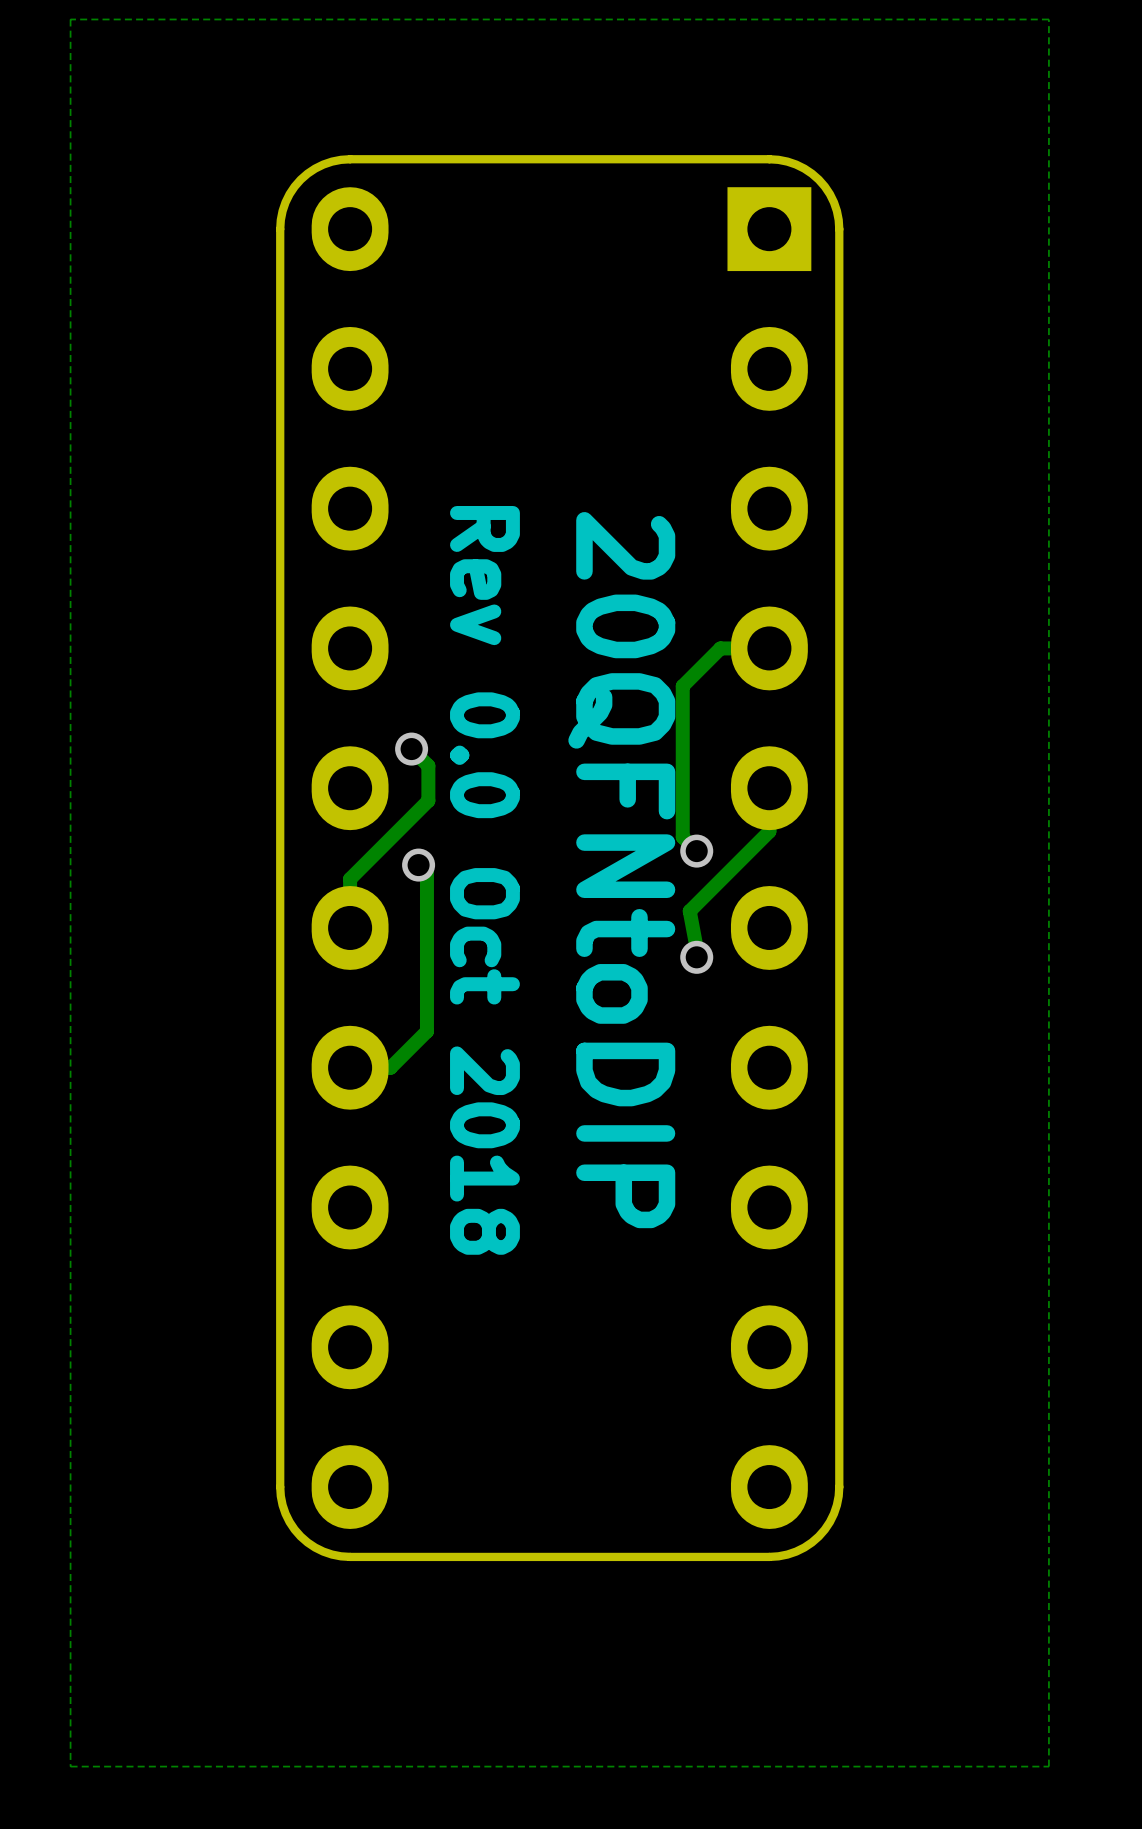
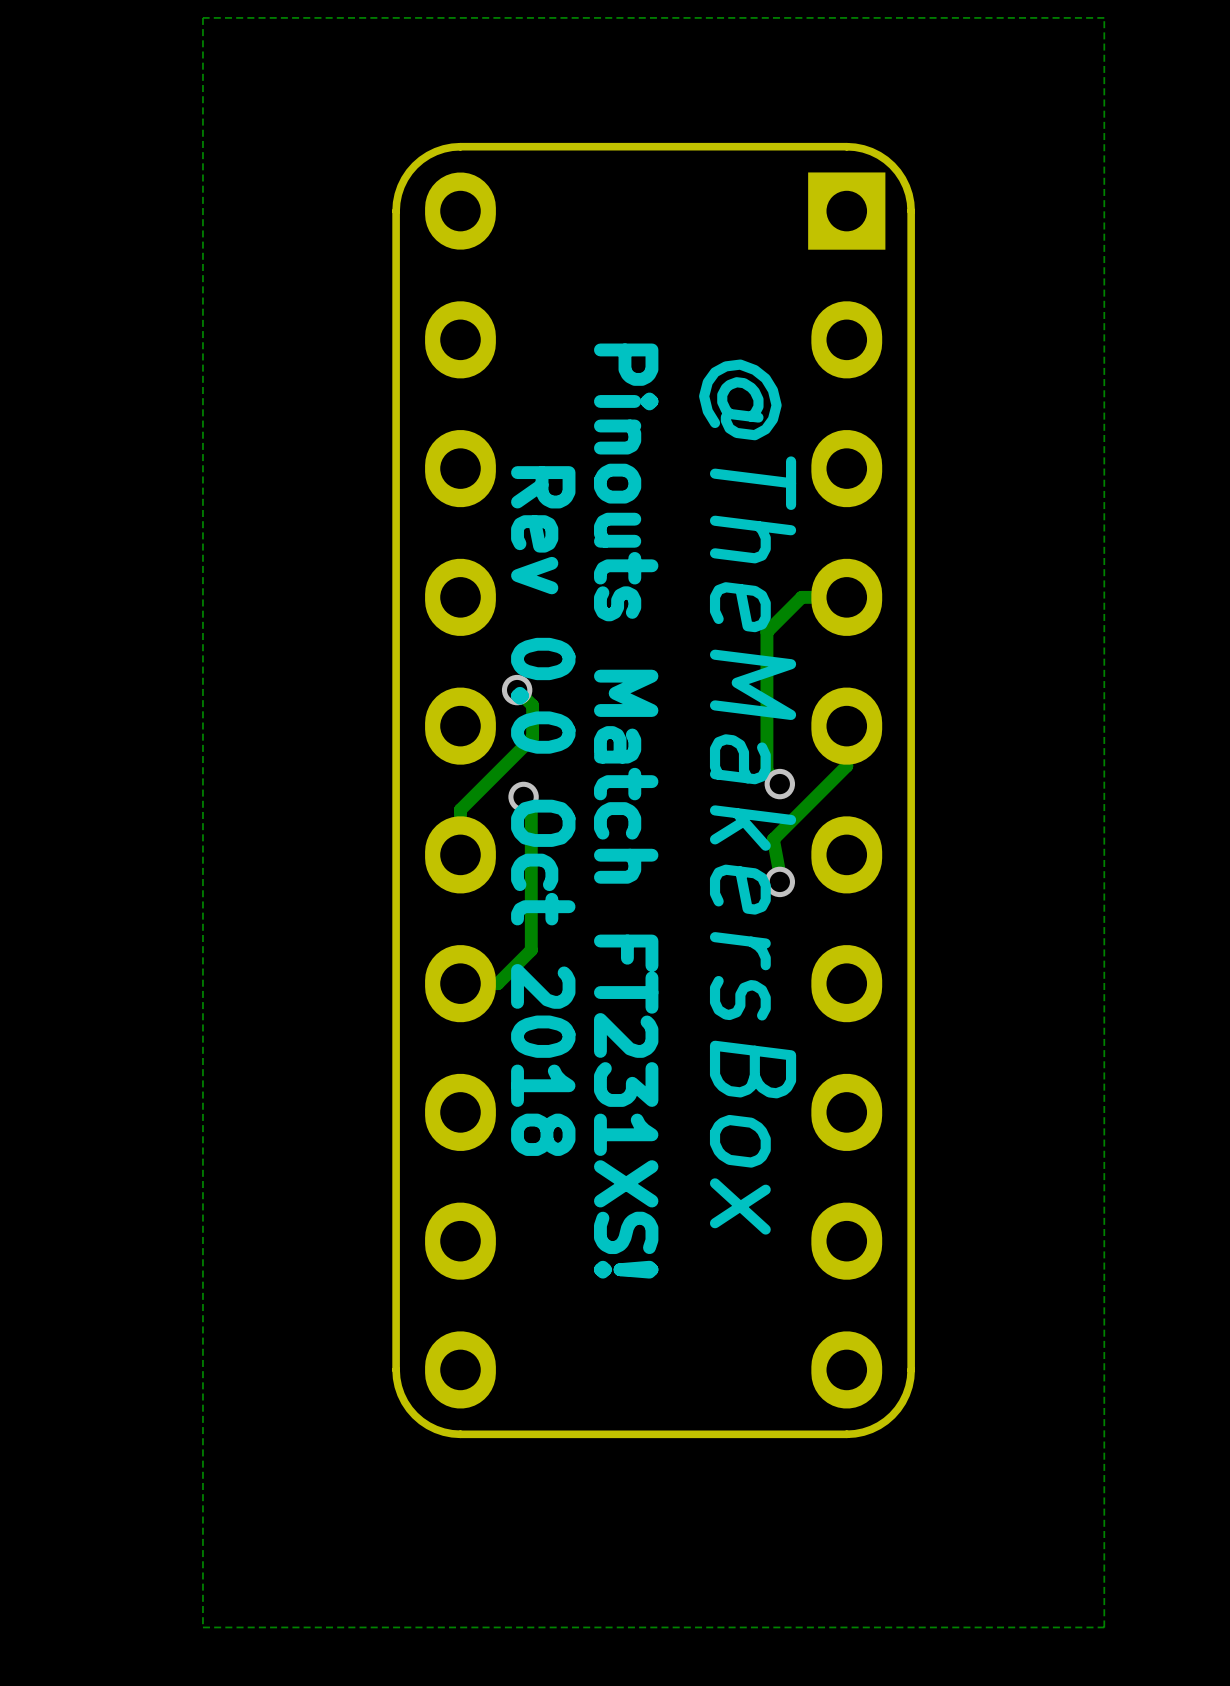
text: 20QFNtoDIP (621, 870) -> @TheMakersBox (747, 797)
text position: Rev 0.0 Oct 2018 (484, 880) -> Rev 0.0 Oct 2018 (543, 811)
text: none -> Pinouts Match FT231XS! (626, 811)

